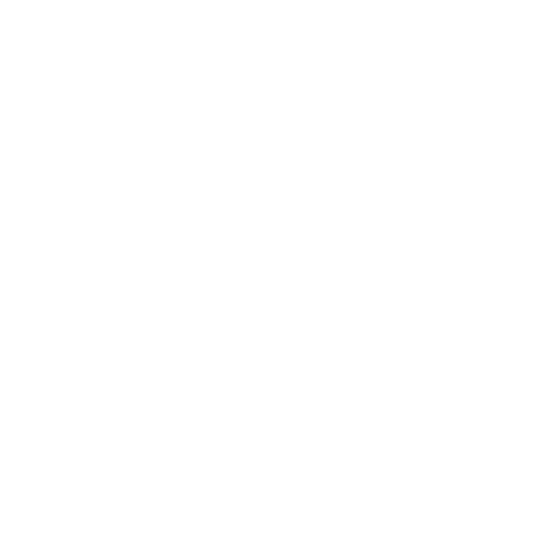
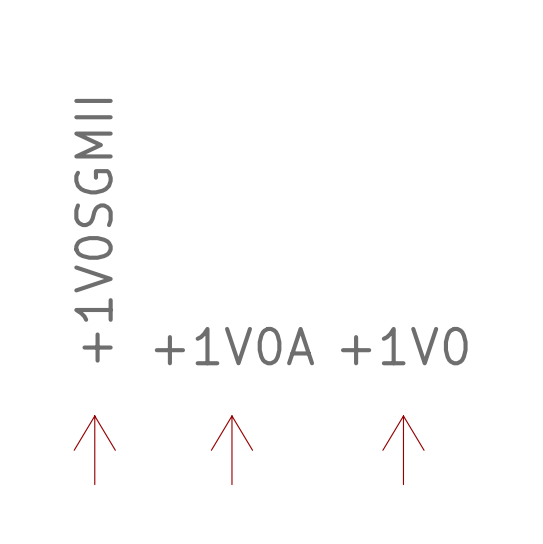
power symbol: none -> +1V0SGMII (94, 450)
power symbol: none -> +1V0A (231, 450)
power symbol: none -> +1V0 (403, 450)

